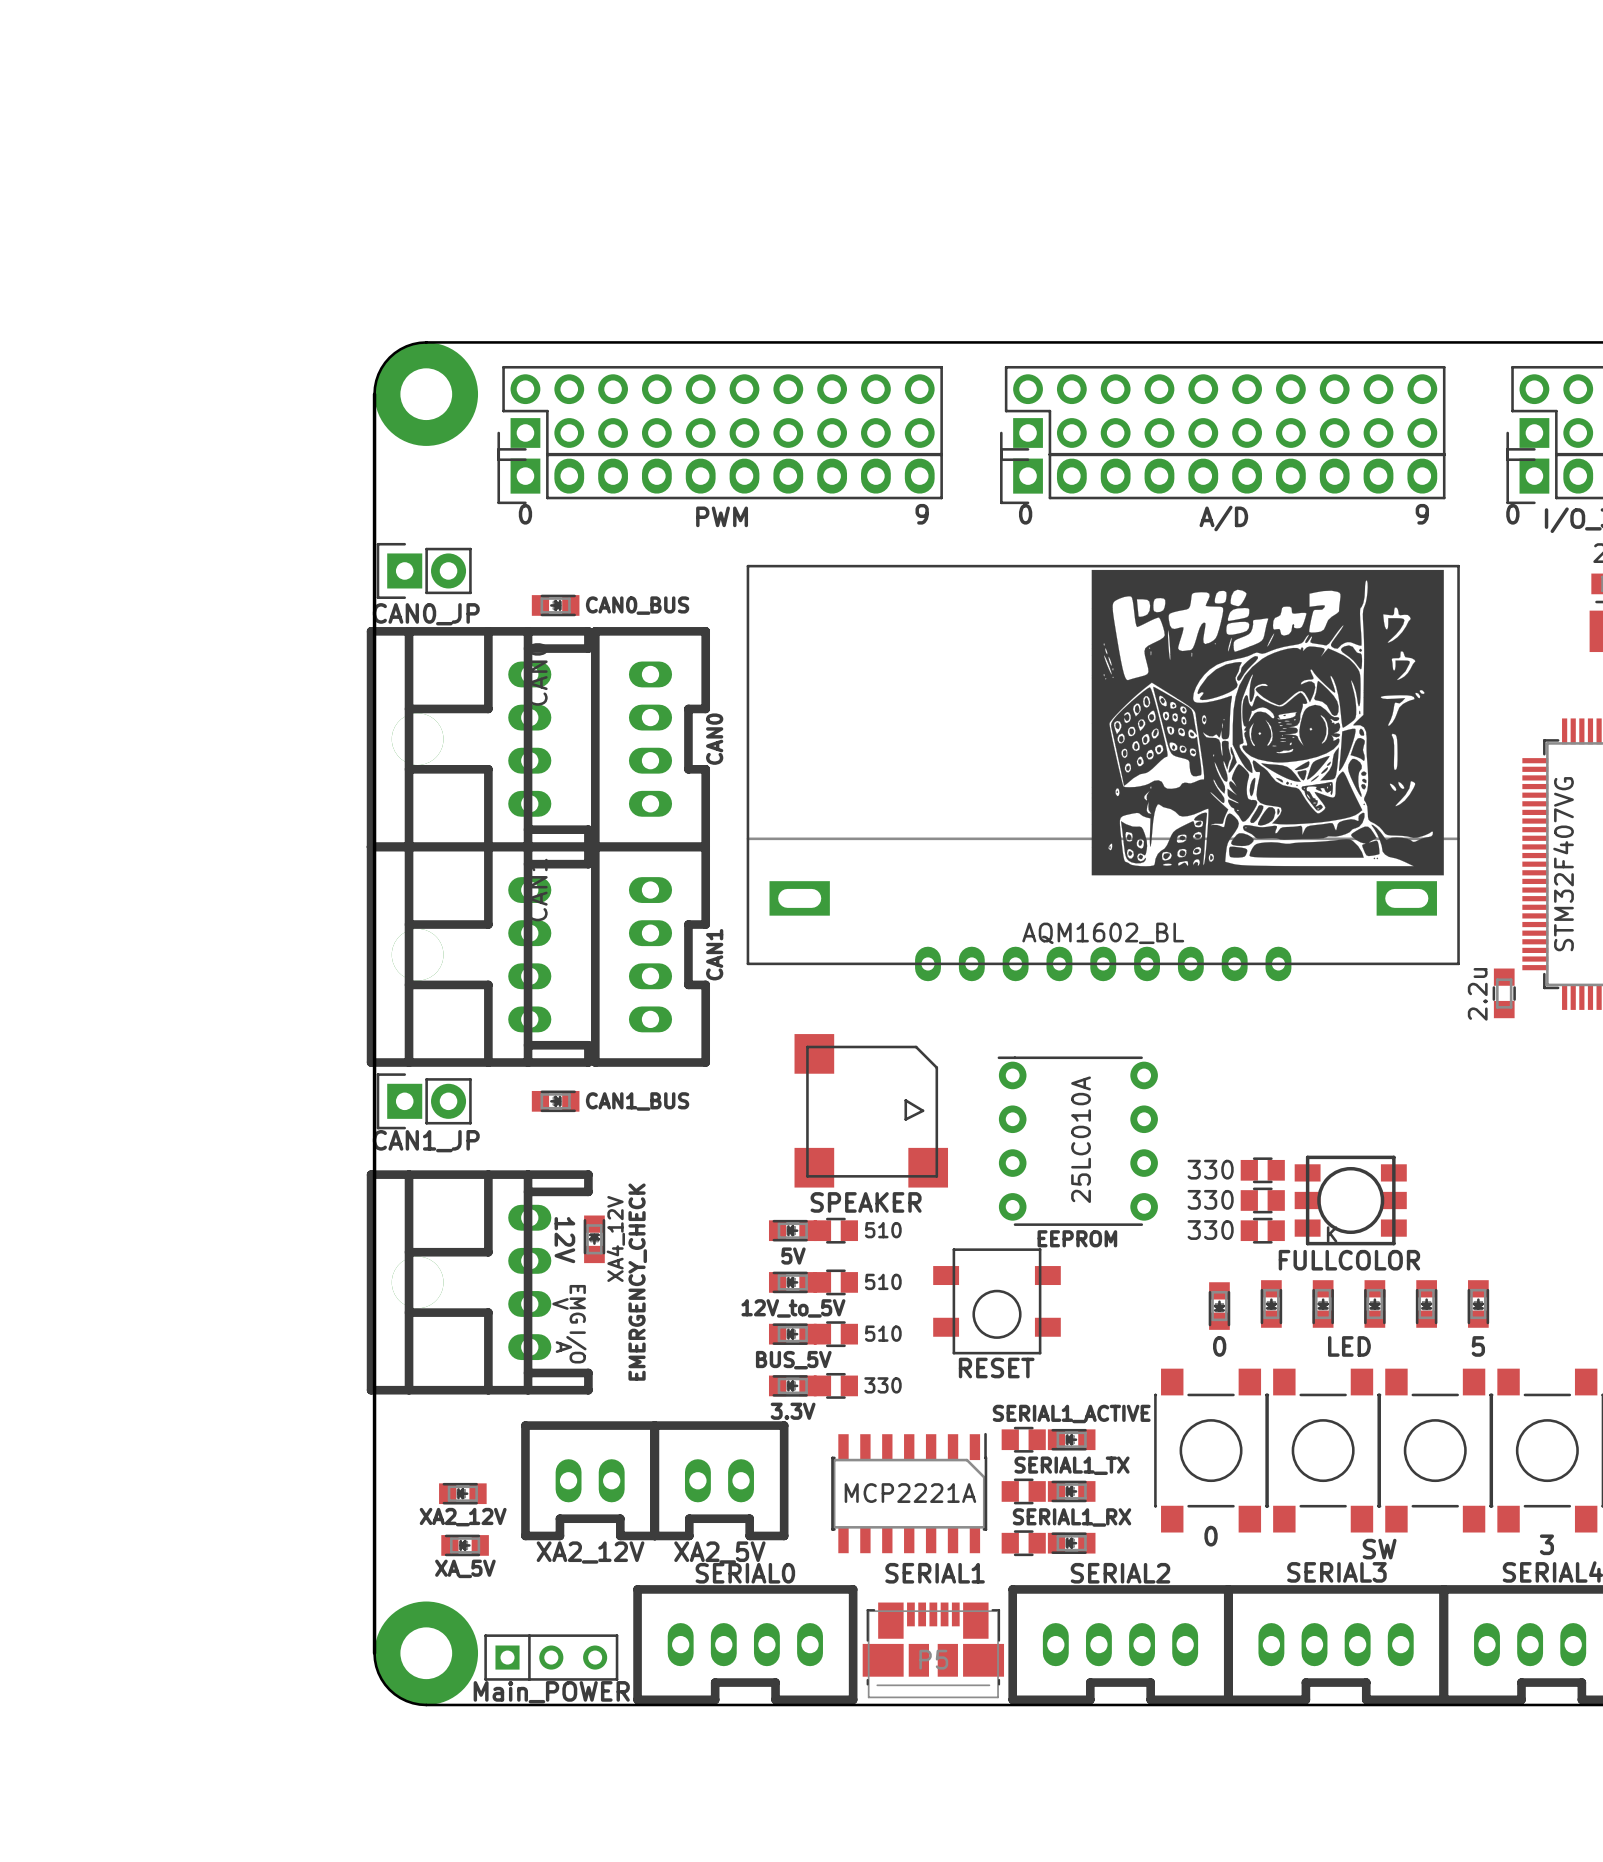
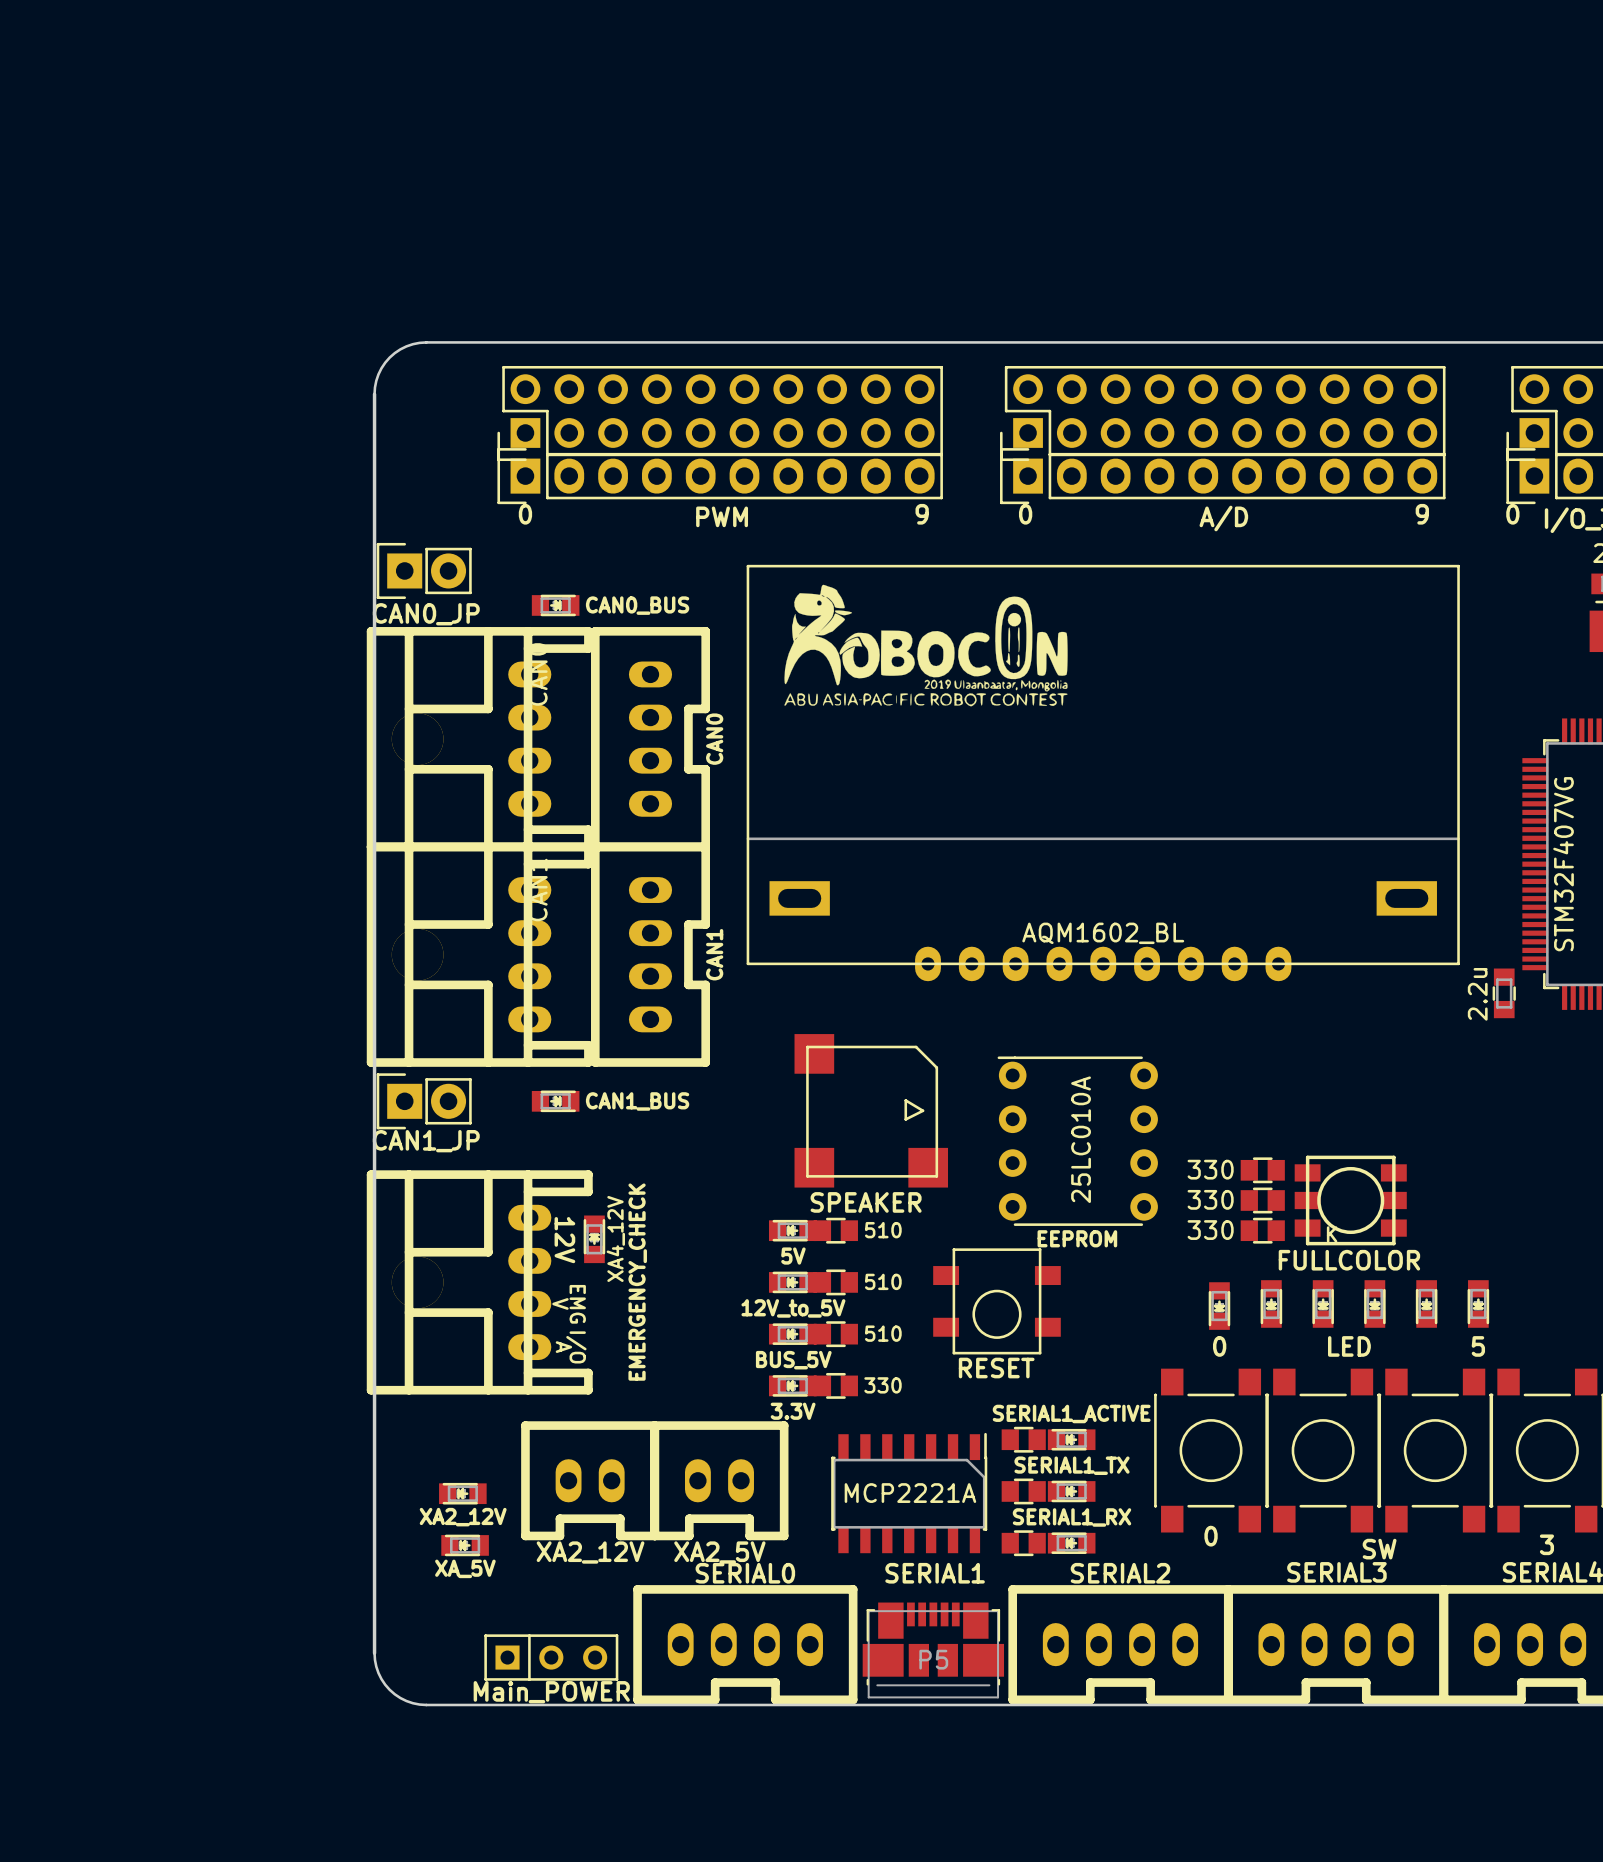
part: (426, 394) -> none
drawing: [1091, 569, 1444, 876] -> none
drawing: none -> [784, 584, 1068, 707]
part: (426, 1653) -> none

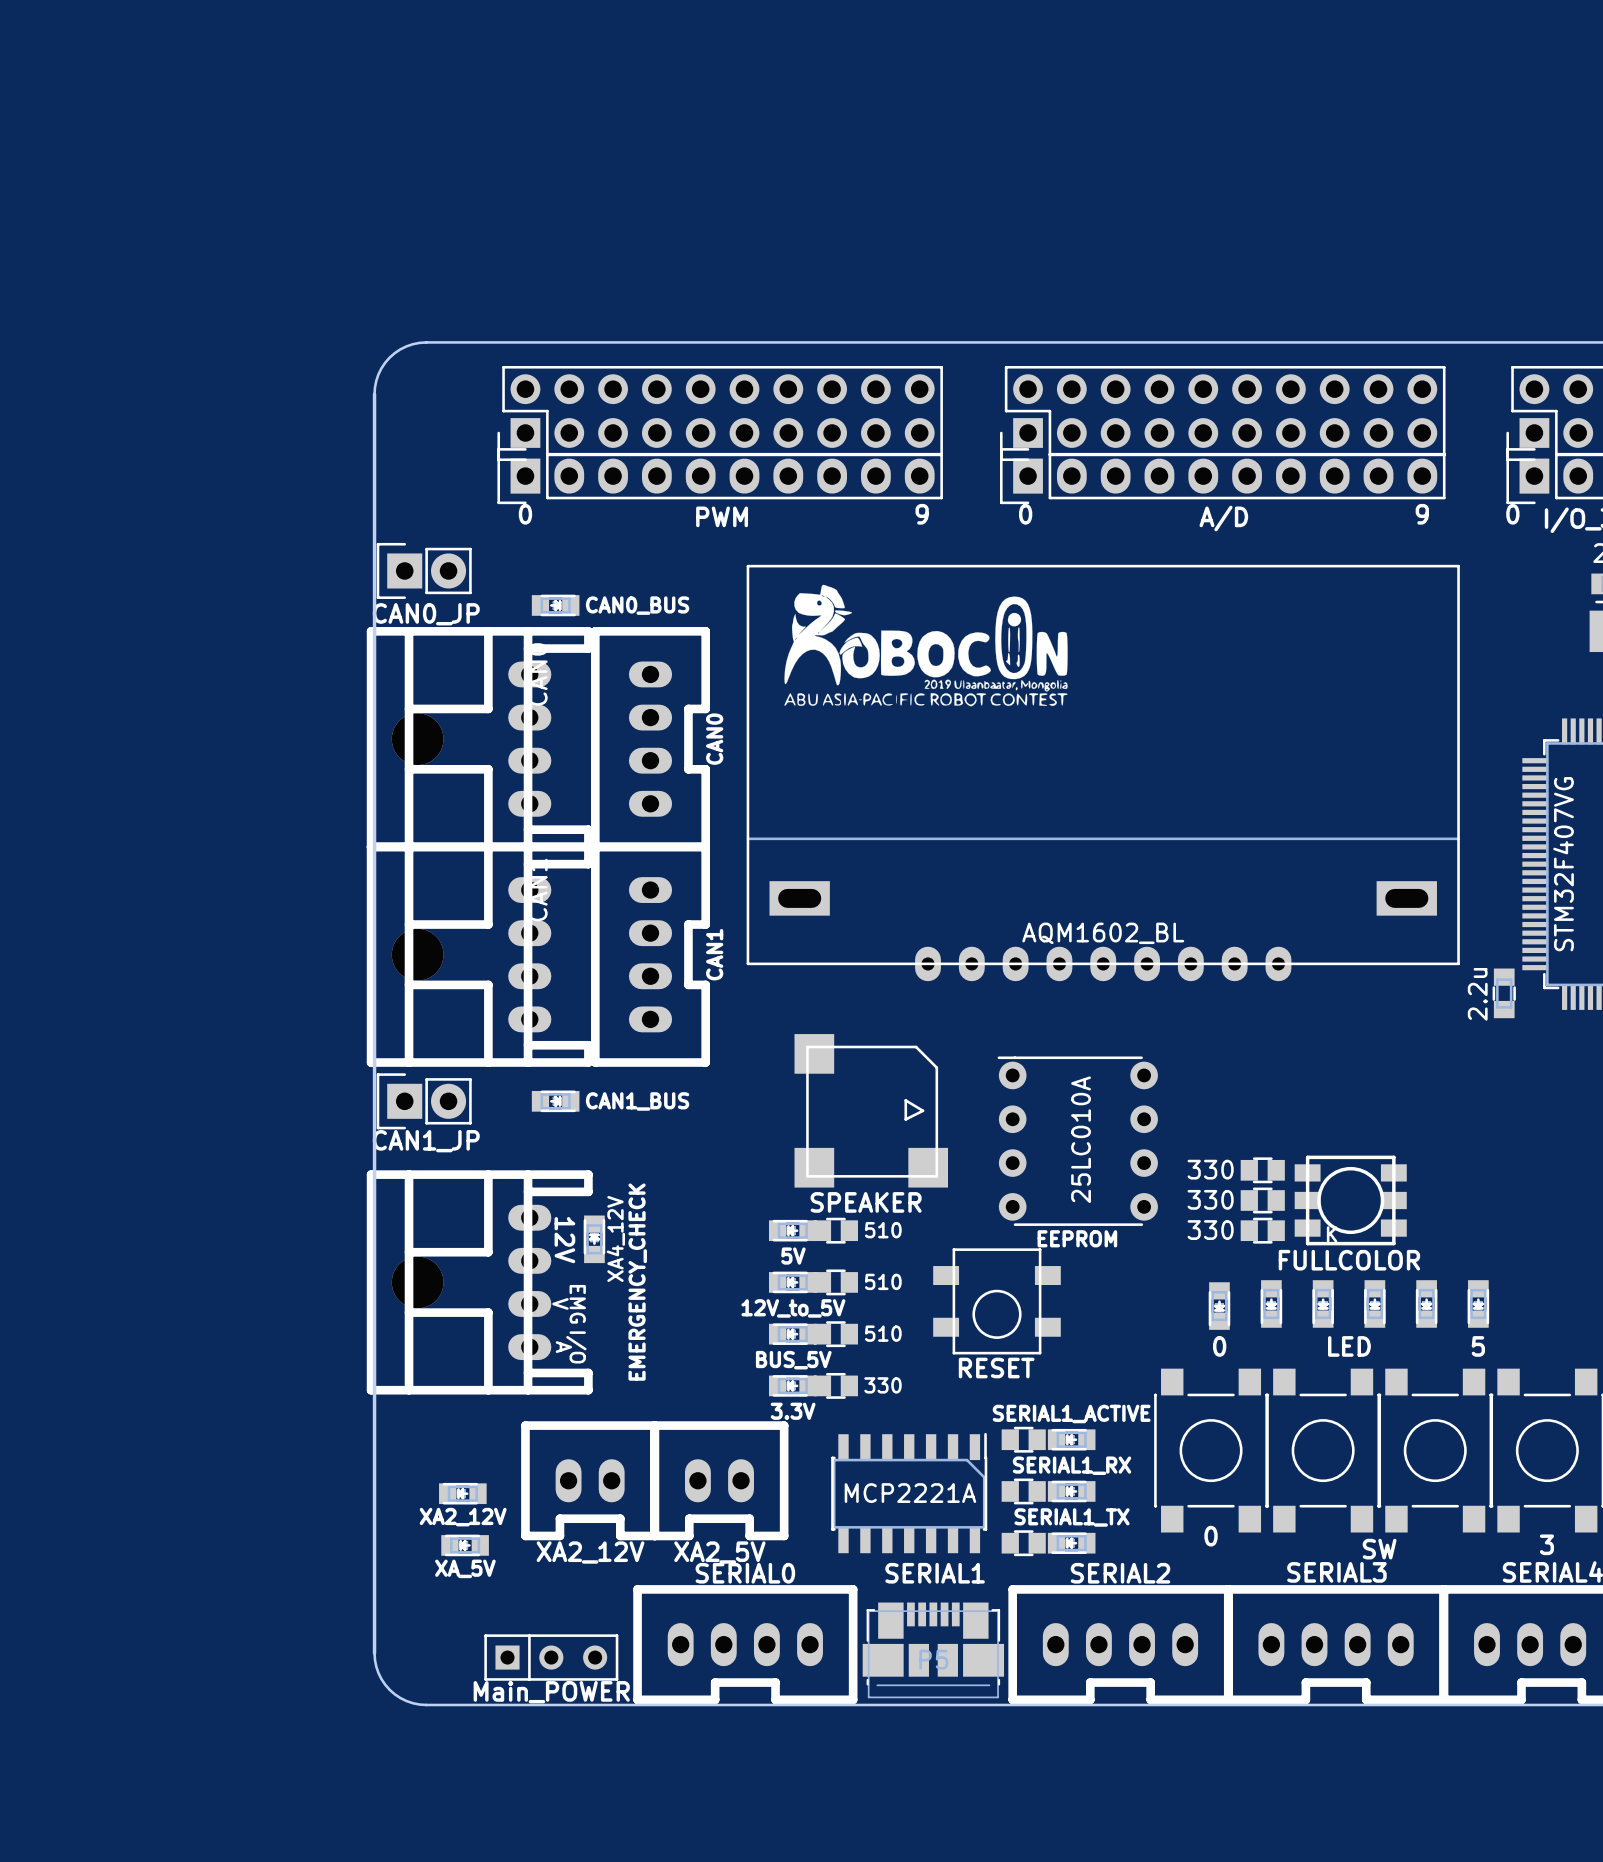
part value: SERIAL1_TX (1072, 1465) -> SERIAL1_RX (1072, 1465)
part value: SERIAL1_RX (1072, 1517) -> SERIAL1_TX (1072, 1517)

